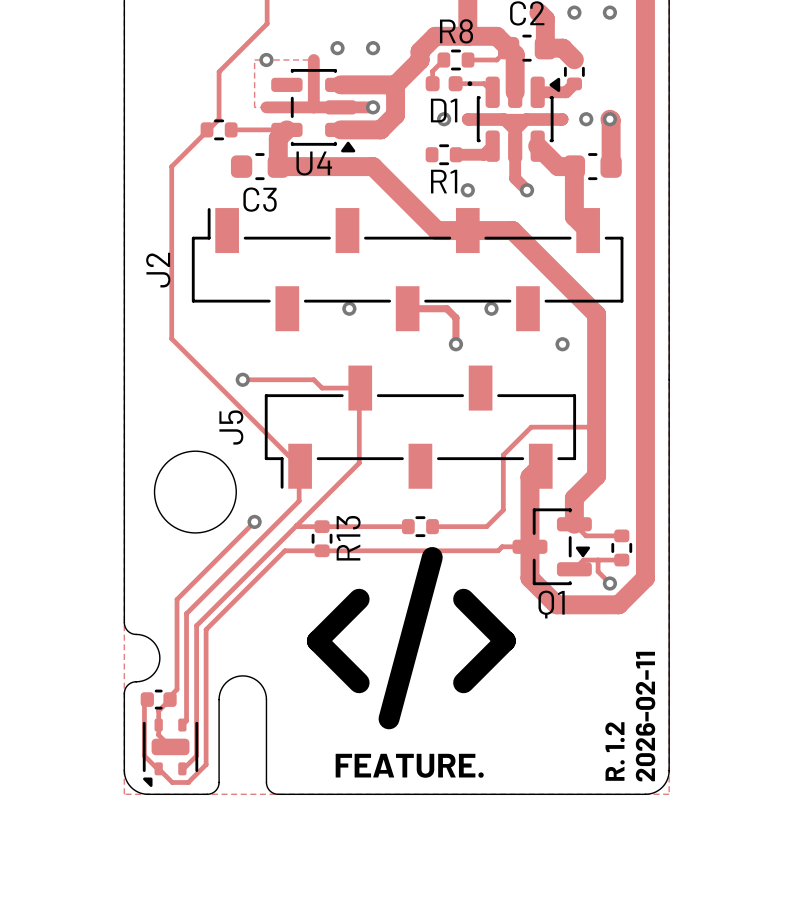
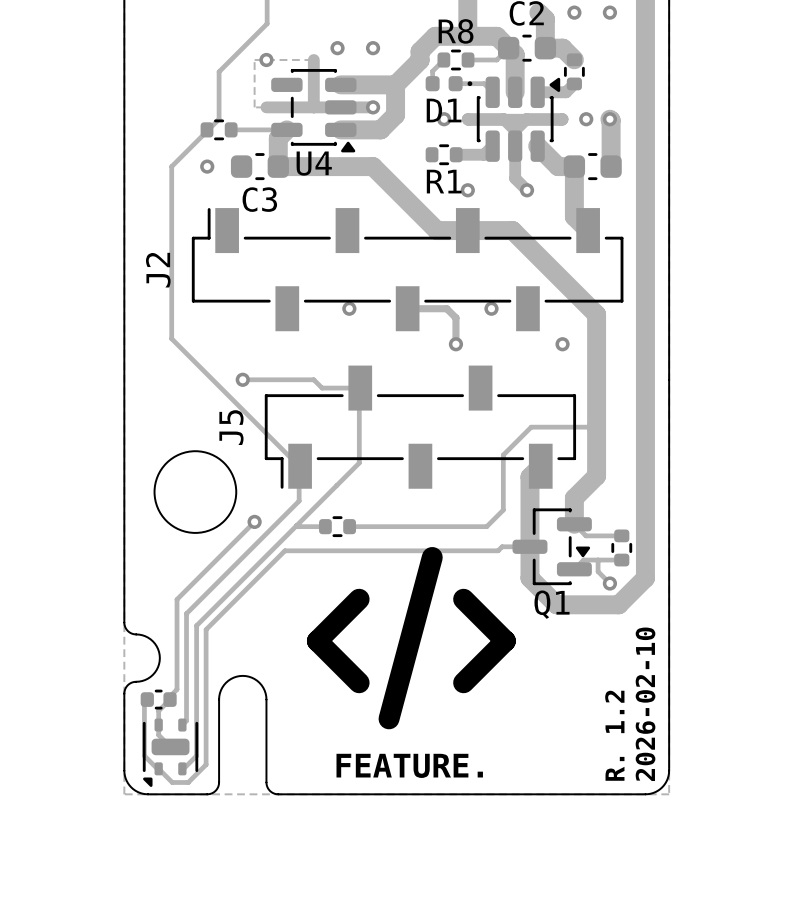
via: none -> (207, 166)
track: (325, 526) (349, 526) -> (408, 526) (432, 526)
part position: (420, 526) -> (337, 526)
R13: (322, 538) -> none
text: 2026-02-11 (645, 716) -> 2026-02-10 (645, 704)

